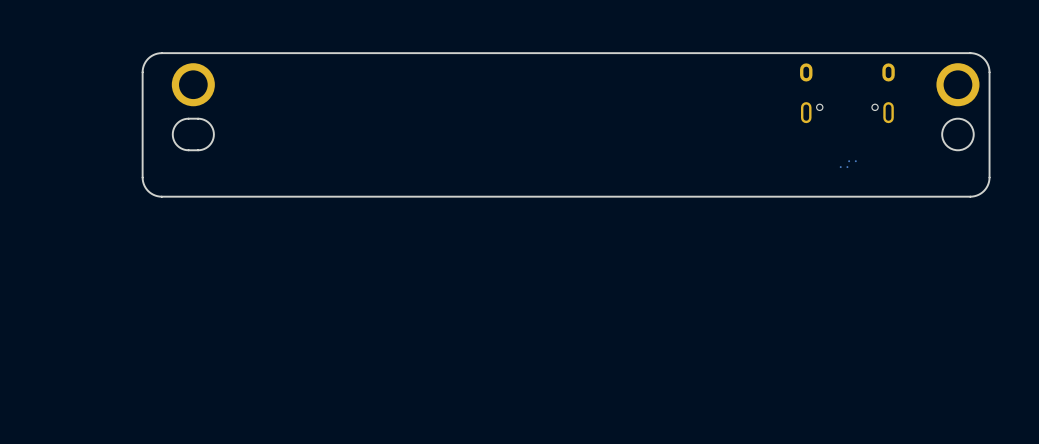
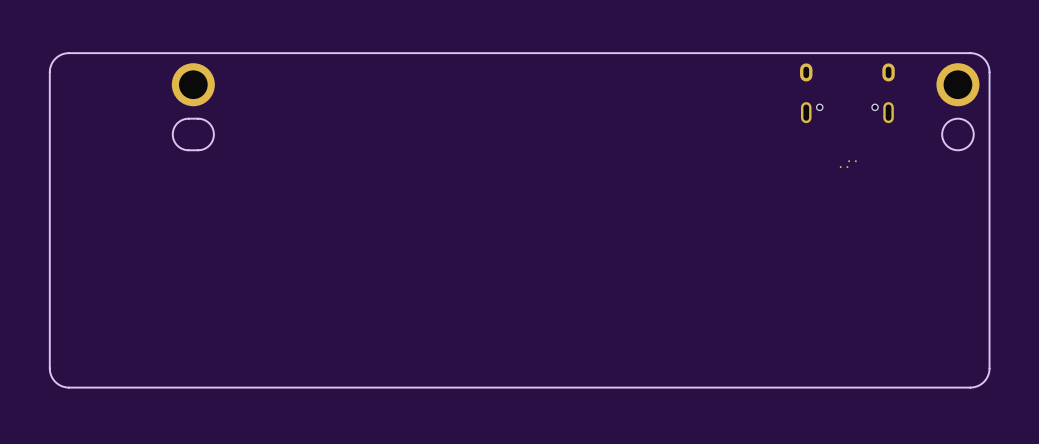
part: (566, 124) -> none
part: none -> (519, 220)

